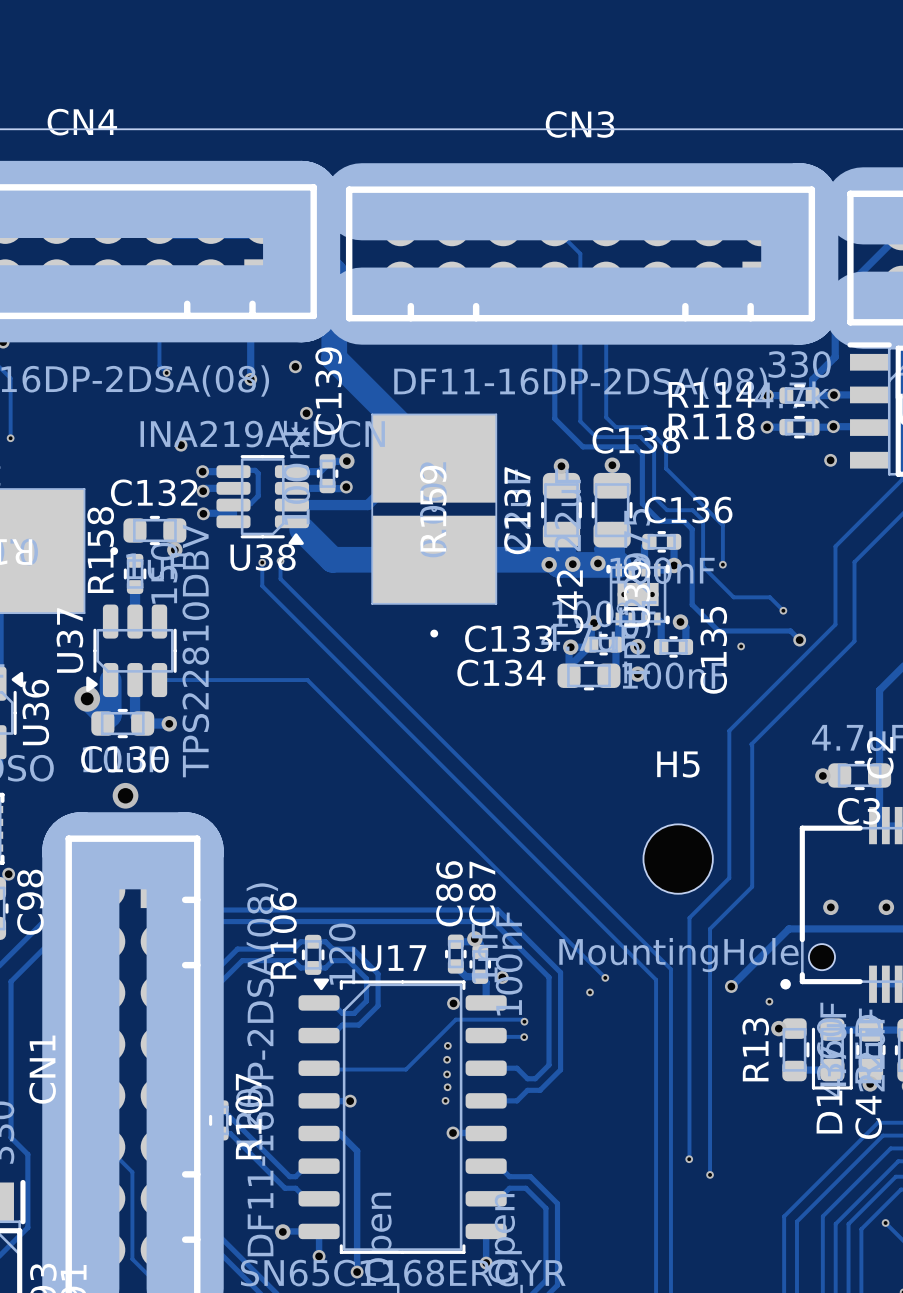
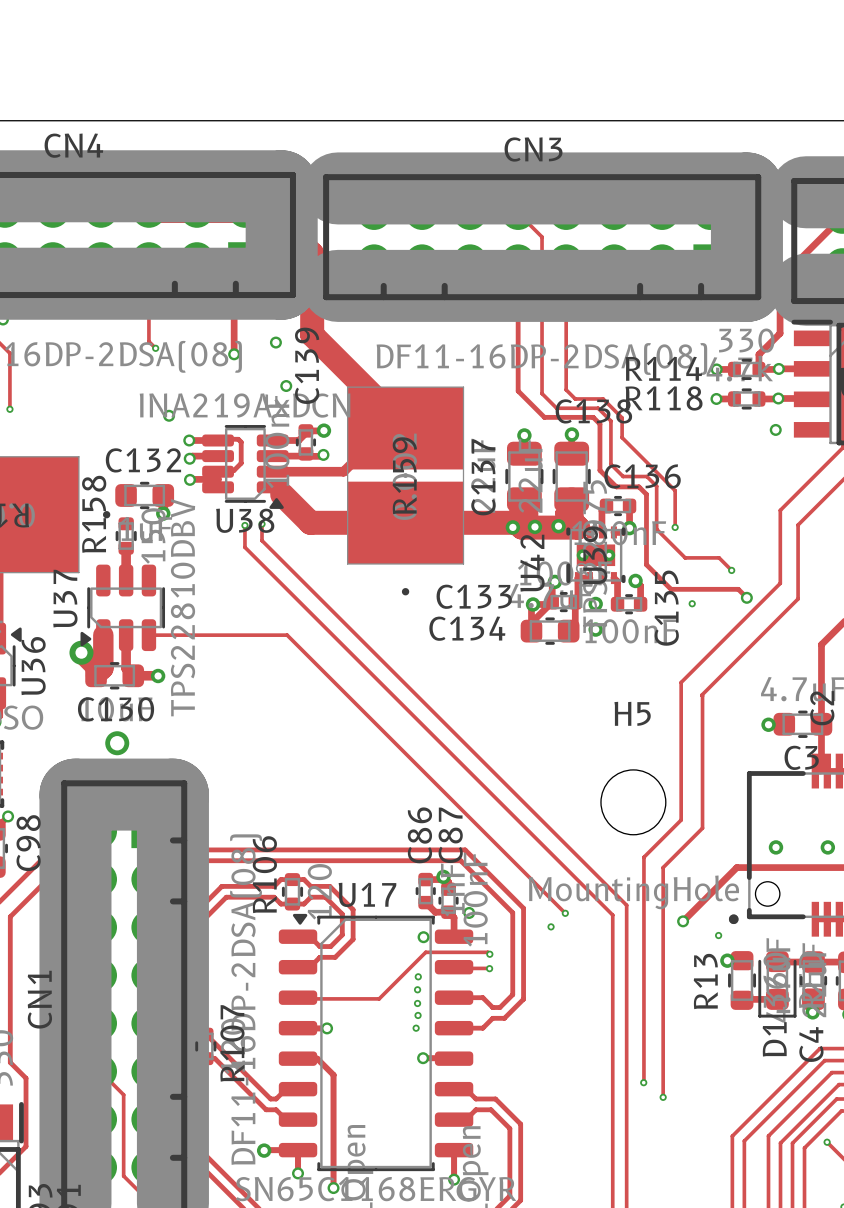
CN4 name position: CN4 (82, 122) -> CN4 (73, 145)
CN3 name position: CN3 (580, 124) -> CN3 (533, 149)

